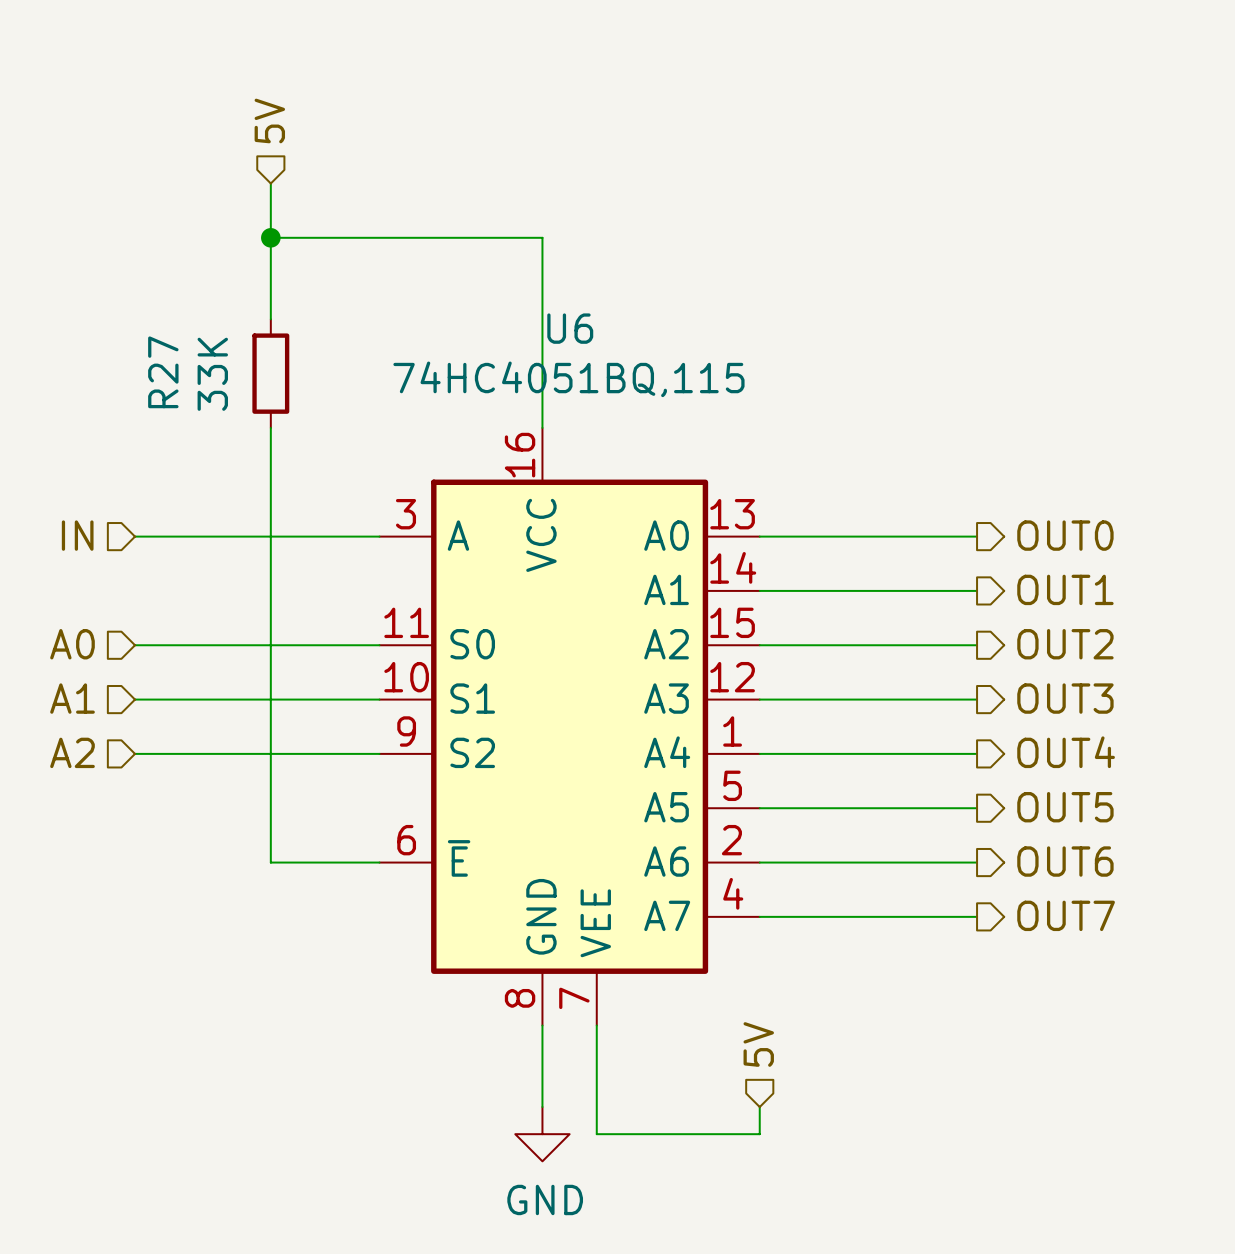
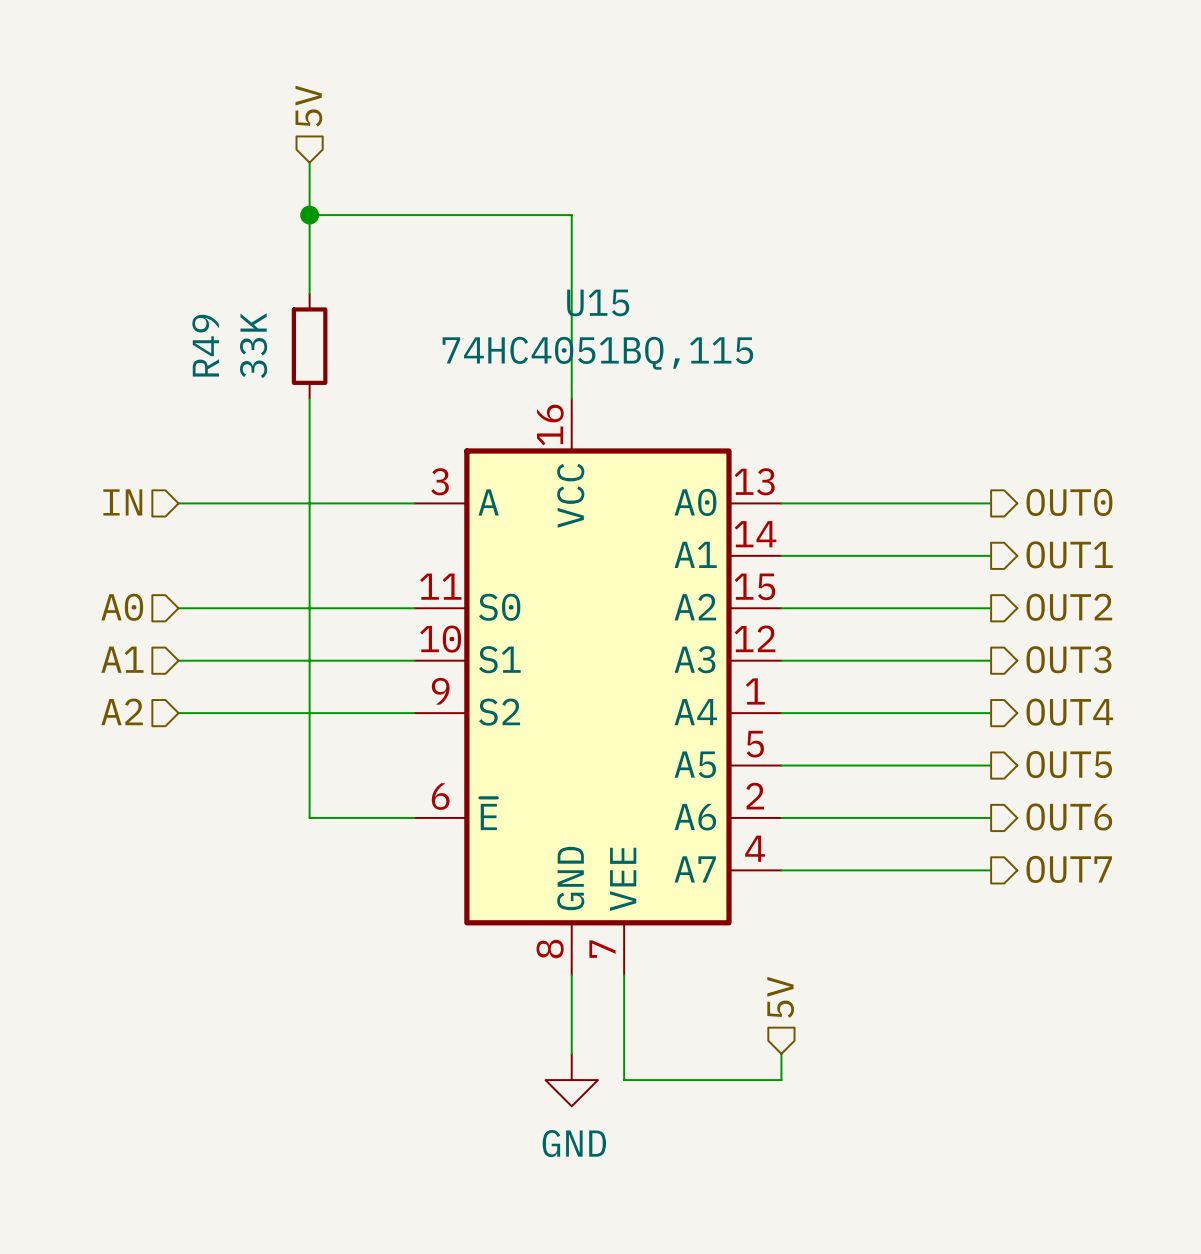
U6 name: U6 (570, 328) -> U15 (598, 302)
R27 name: R27 (163, 372) -> R49 (205, 345)

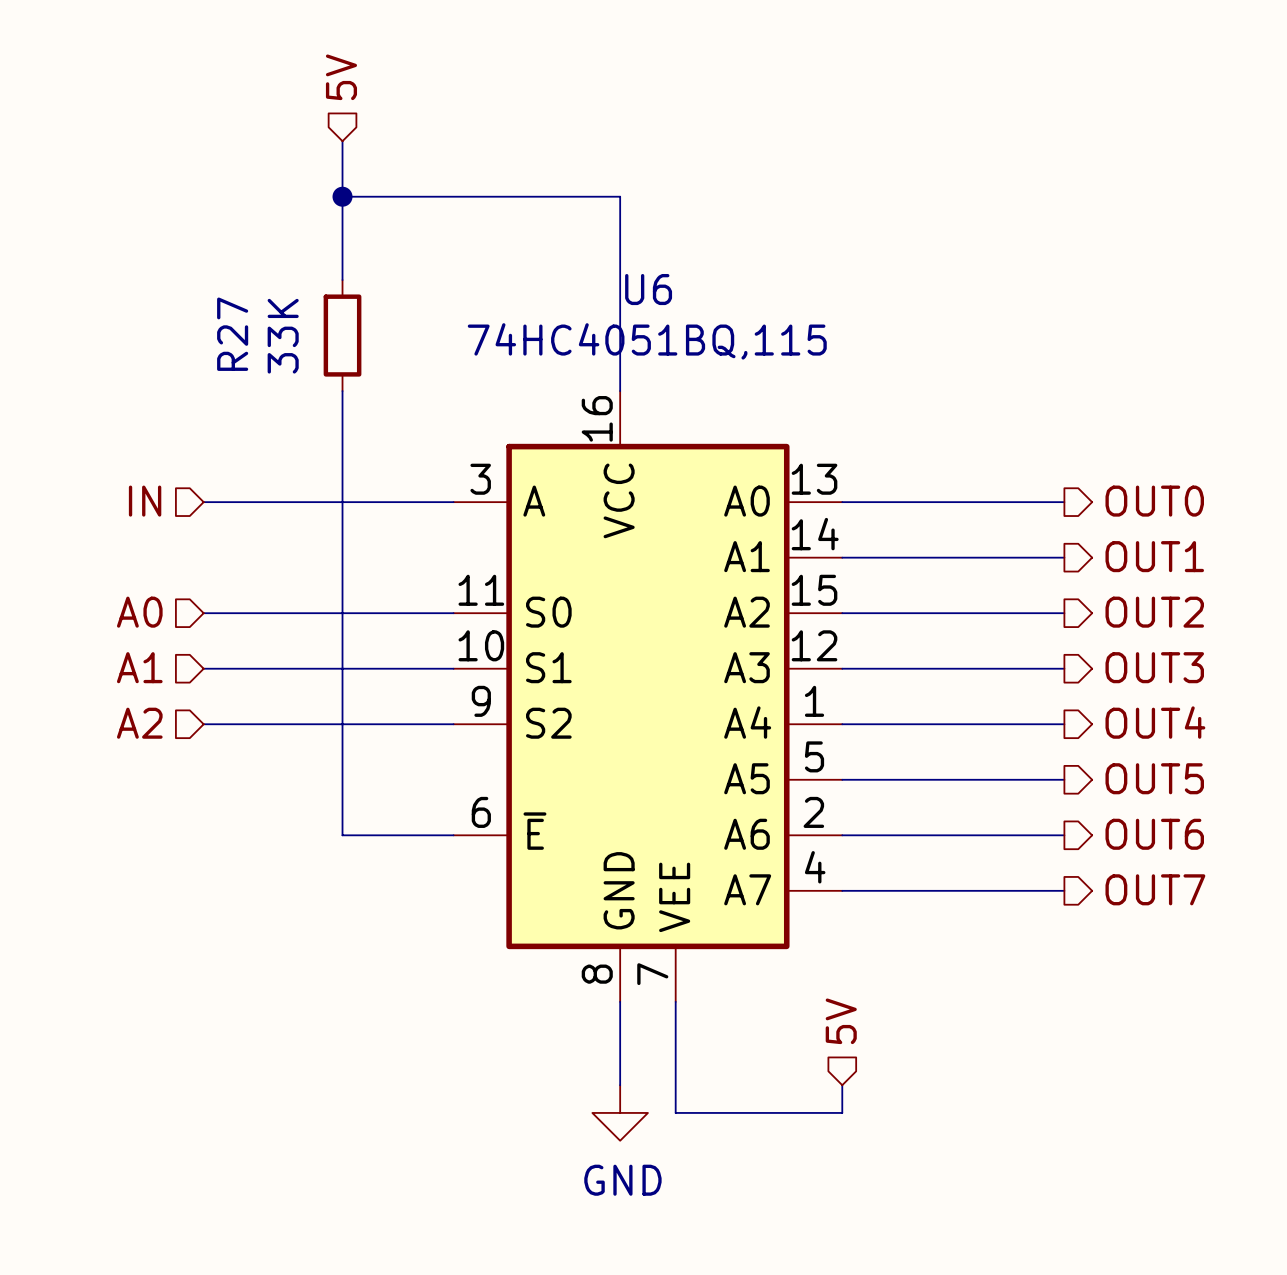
U15 name: U15 (598, 302) -> U6 (648, 289)
R49 name: R49 (205, 345) -> R27 (232, 334)

